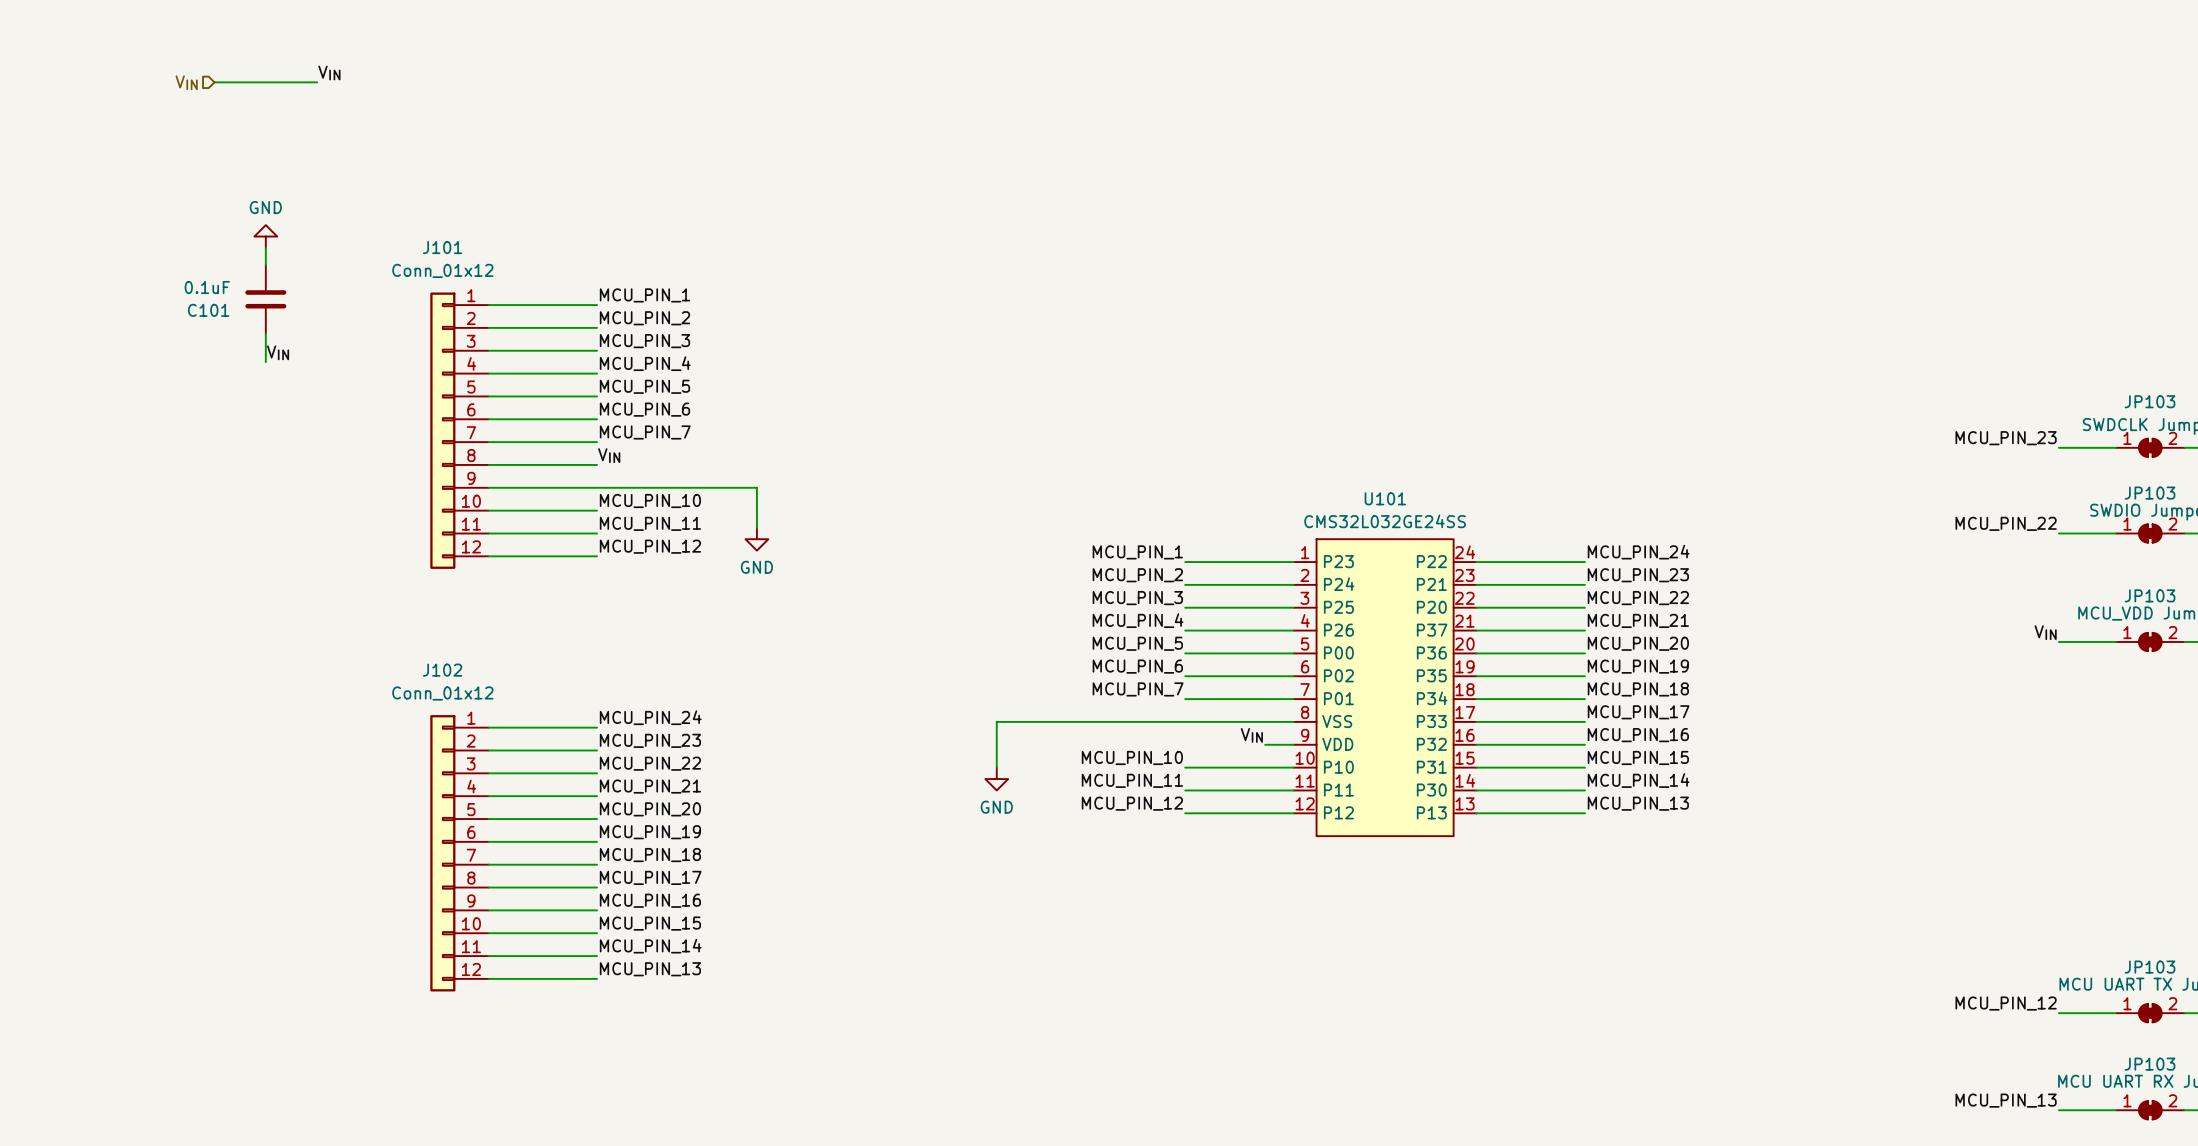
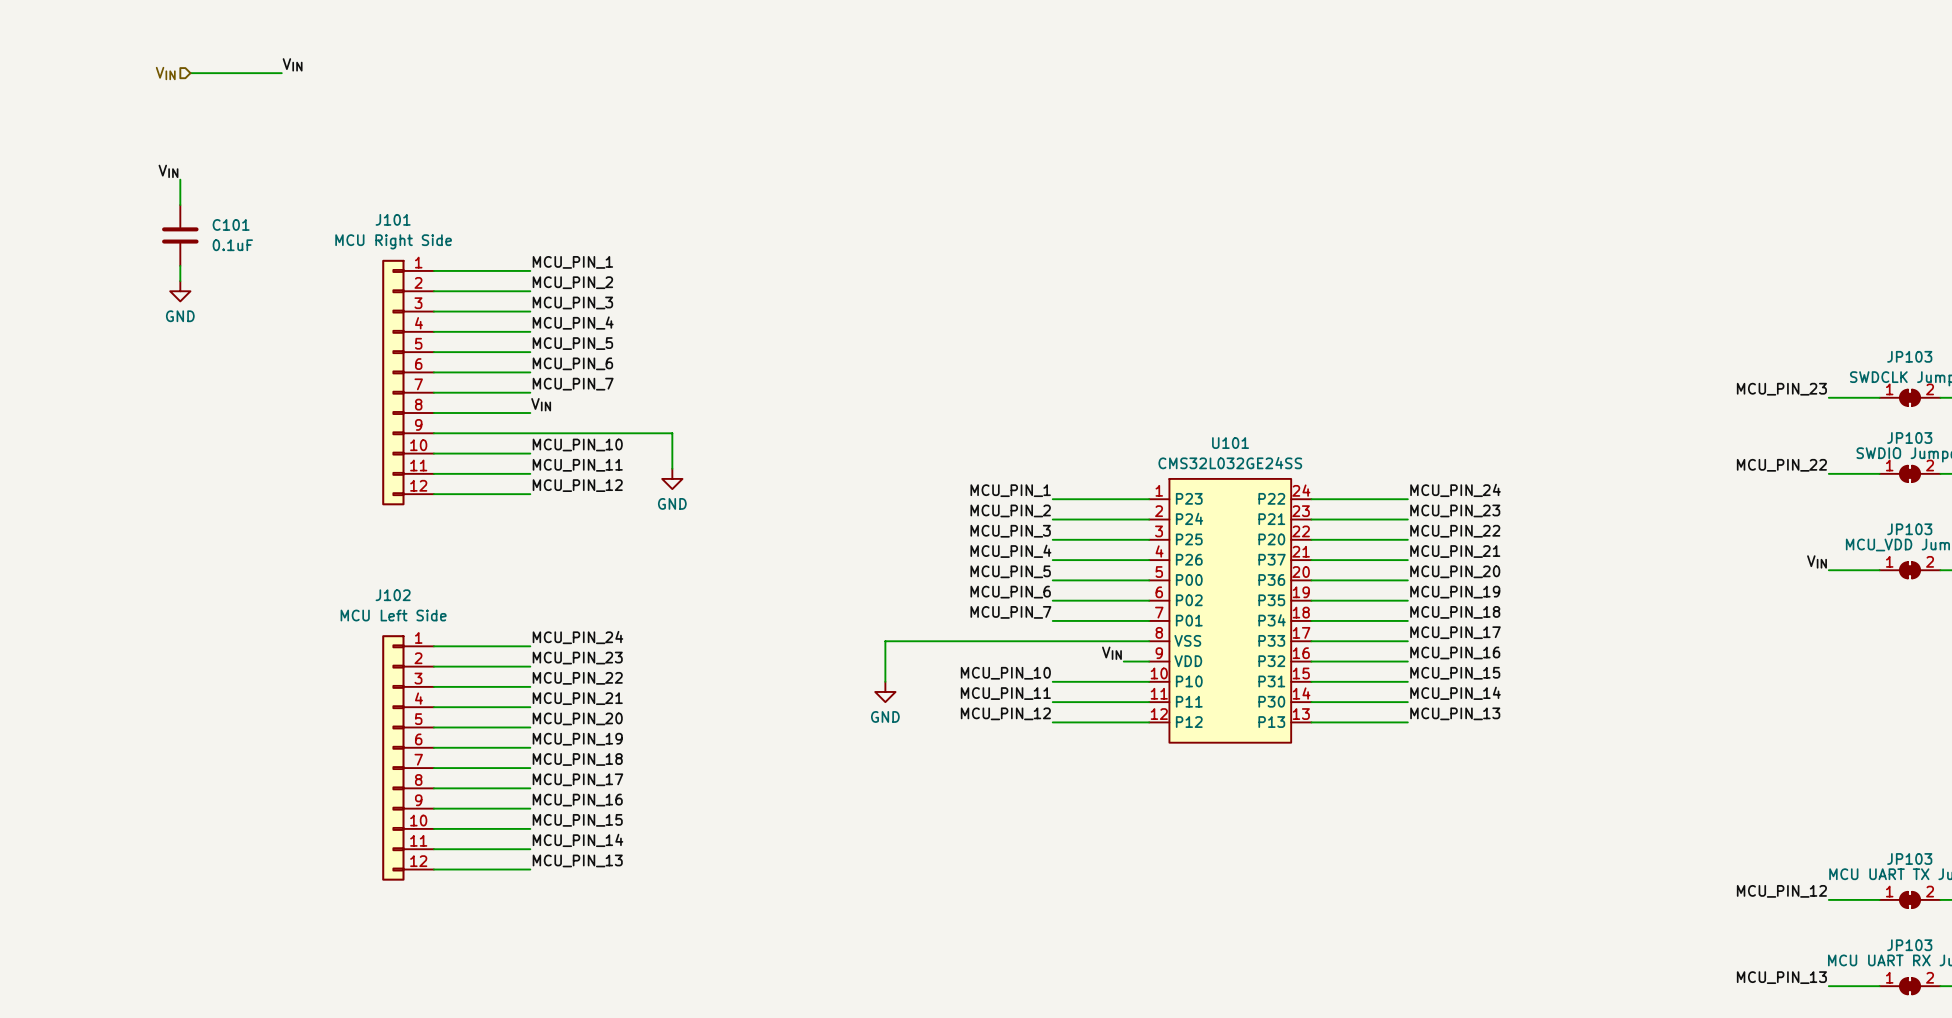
power symbol rotation: 0° (265, 236) -> 180° (180, 291)
power symbol position: GND (265, 236) -> GND (180, 291)
J101 value: Conn_01x12 (442, 270) -> MCU Right Side (393, 241)
C101 value position: 0.1uF (207, 287) -> 0.1uF (232, 245)
C101 position: (265, 299) -> (180, 235)
C101 name position: C101 (208, 310) -> C101 (231, 224)
wire: (265, 333) (265, 362) -> (180, 179) (180, 205)
label position: VIN (278, 352) -> VIN (168, 171)
J102 value: Conn_01x12 (442, 693) -> MCU Left Side (393, 615)

